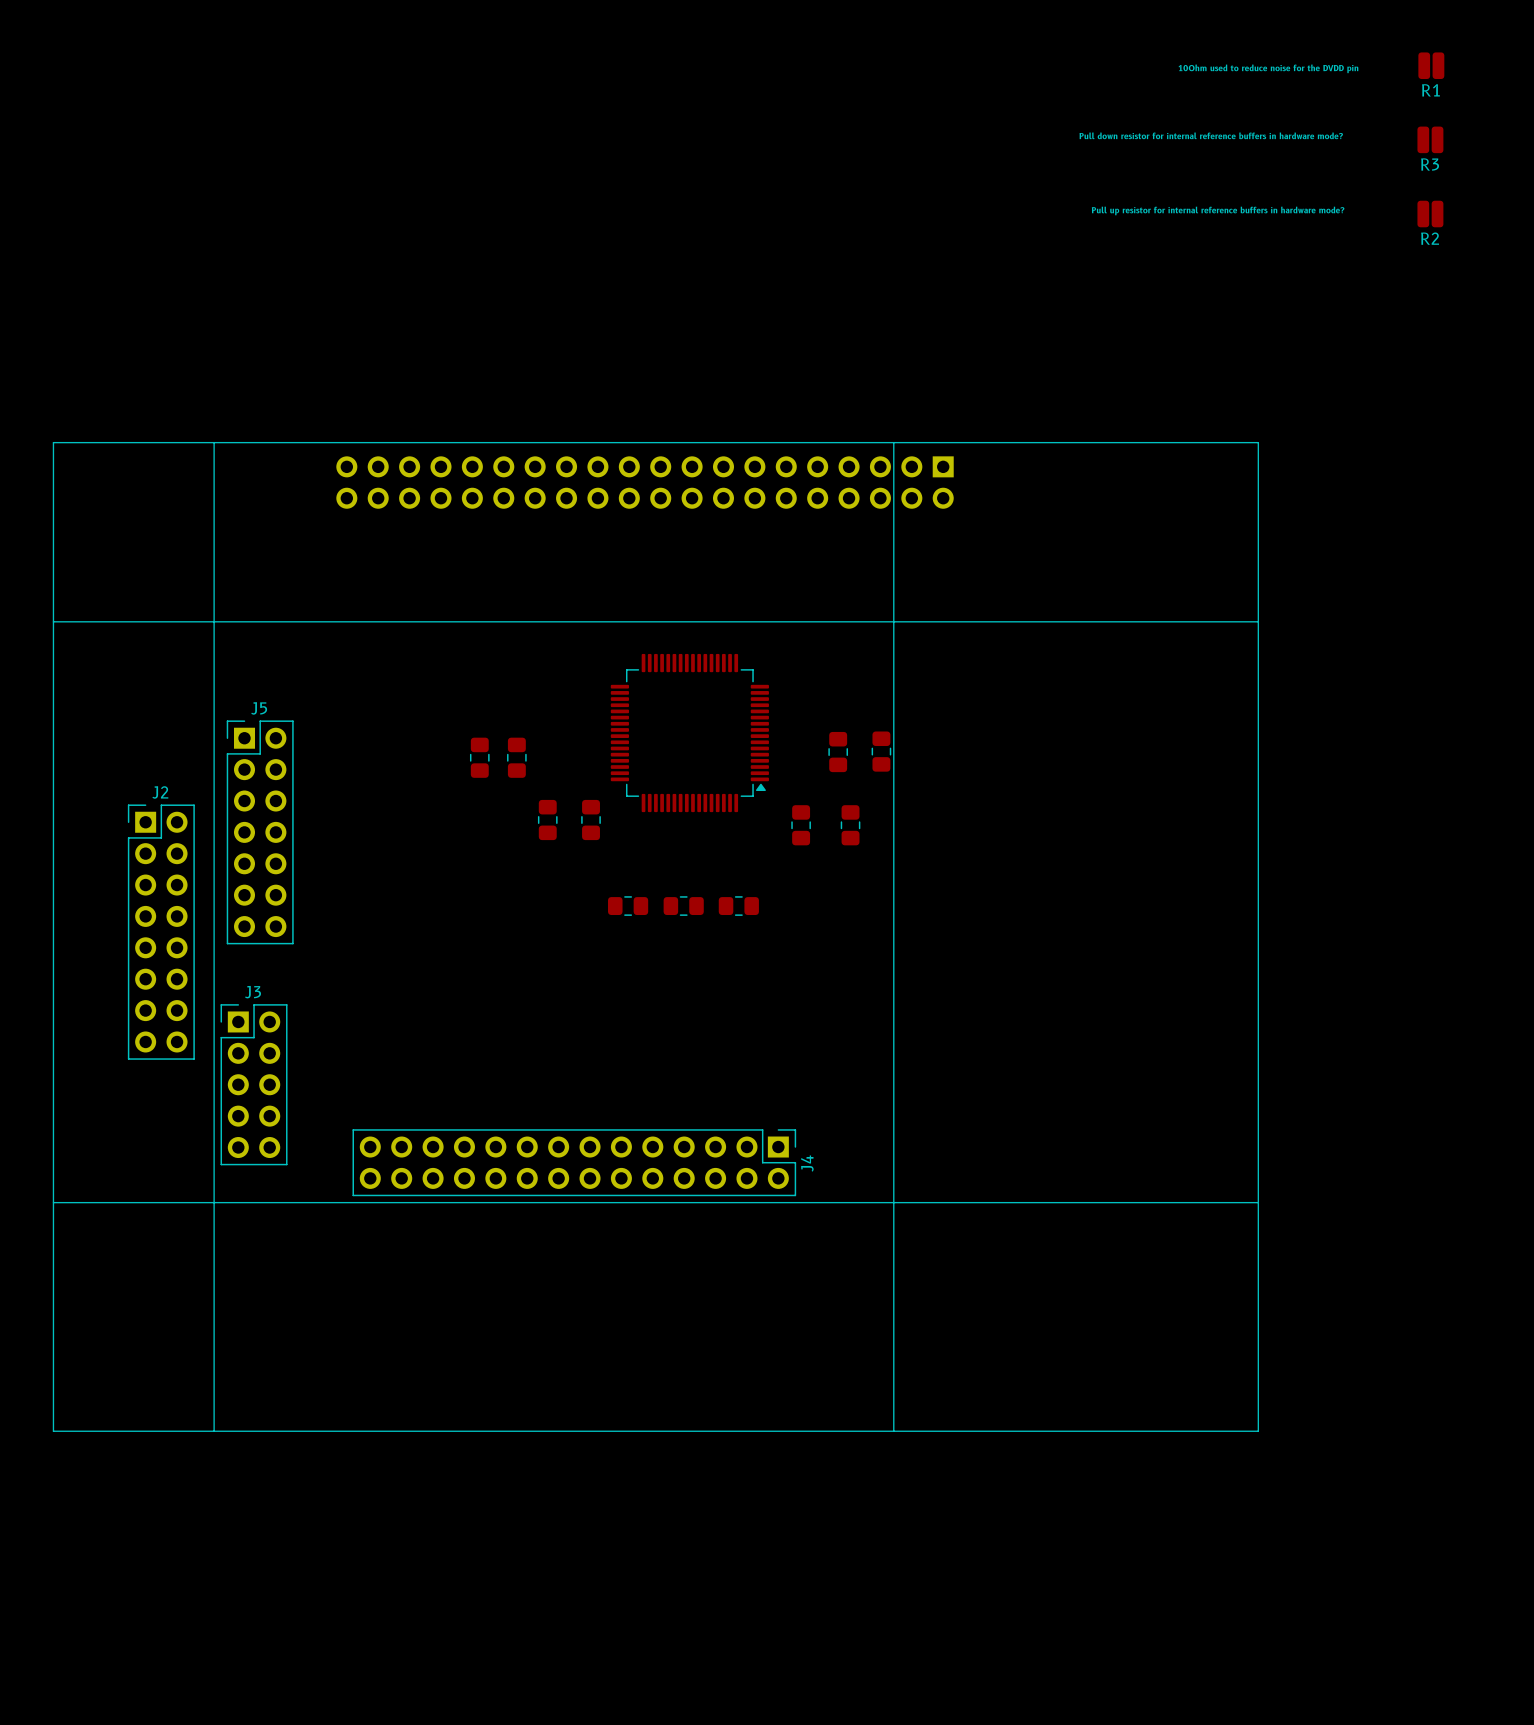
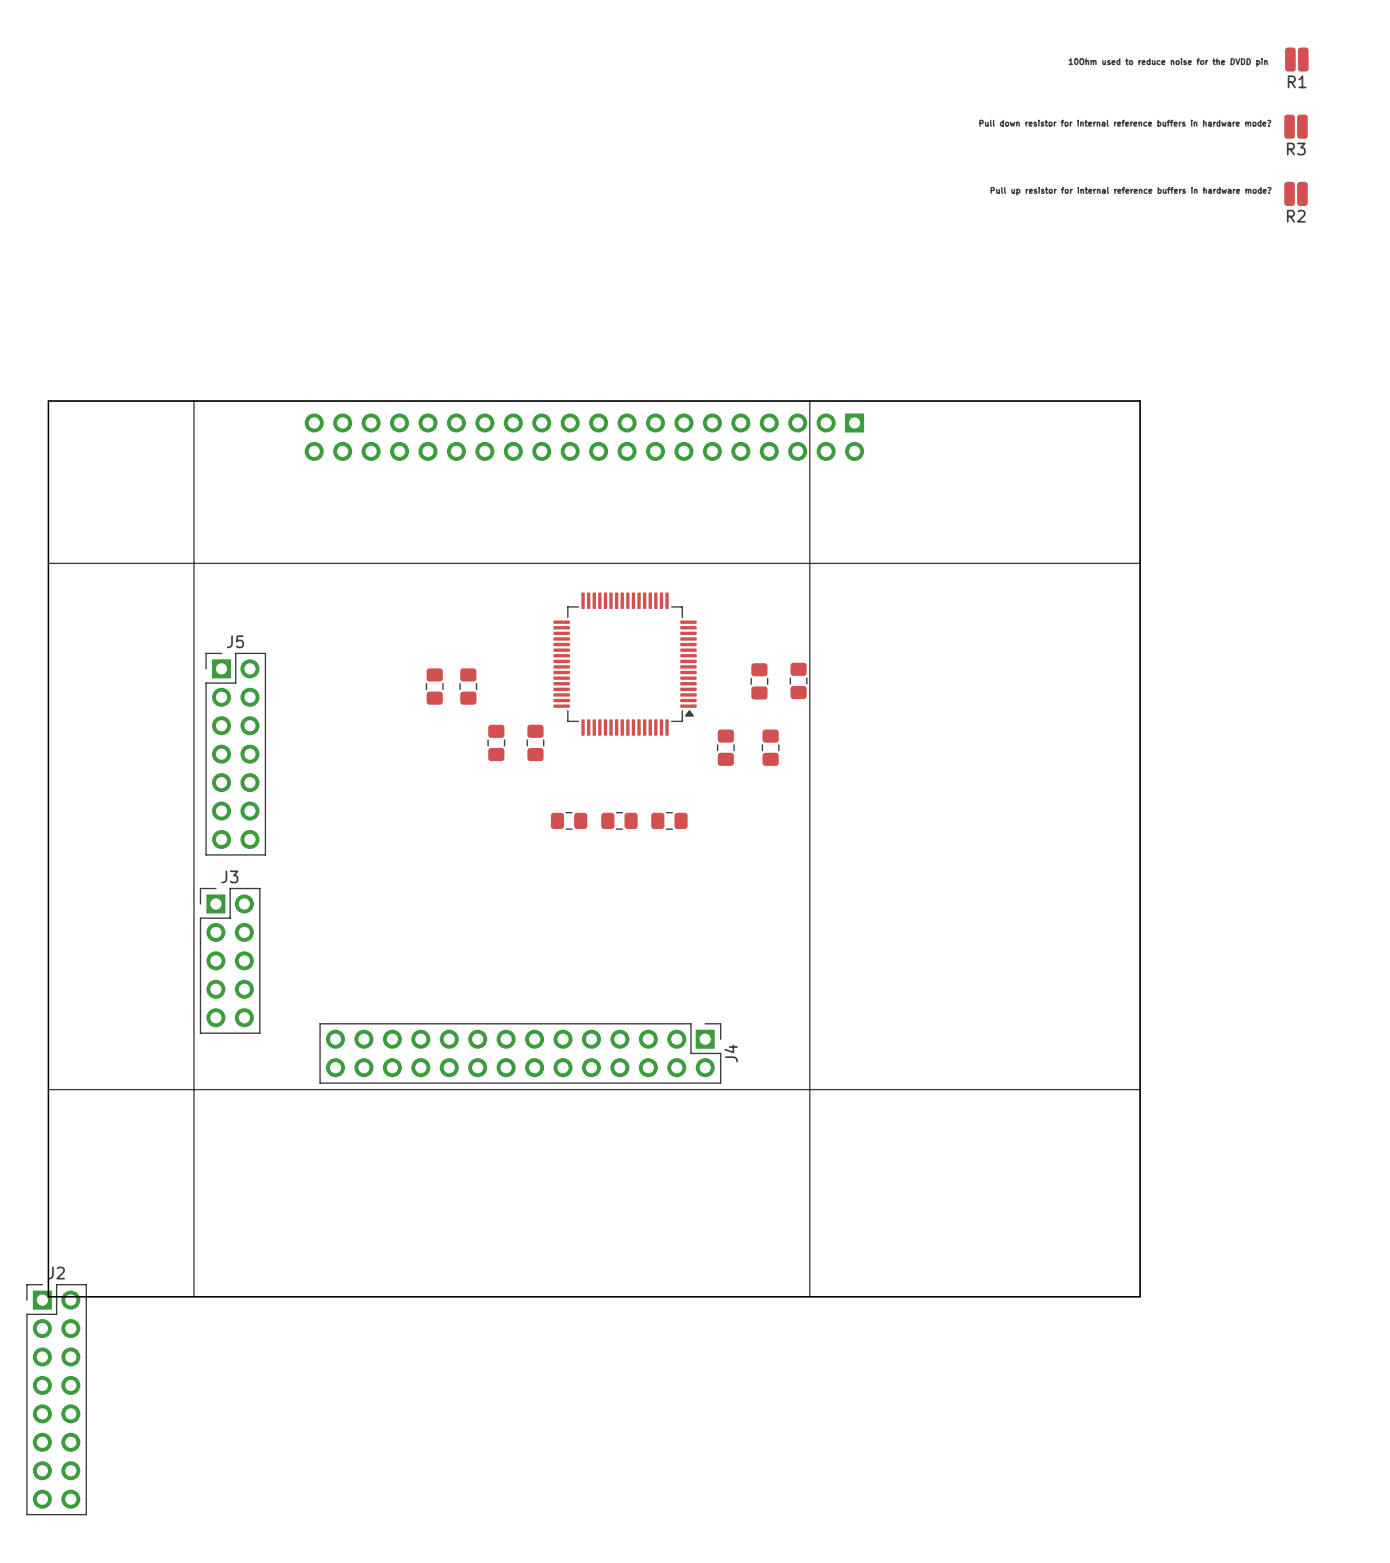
board edge: none -> (48, 401) (1140, 401) (1140, 1296) (48, 1296) (48, 401)
J2 position: (161, 932) -> (56, 1399)
J3 position: (254, 1084) -> (230, 960)

